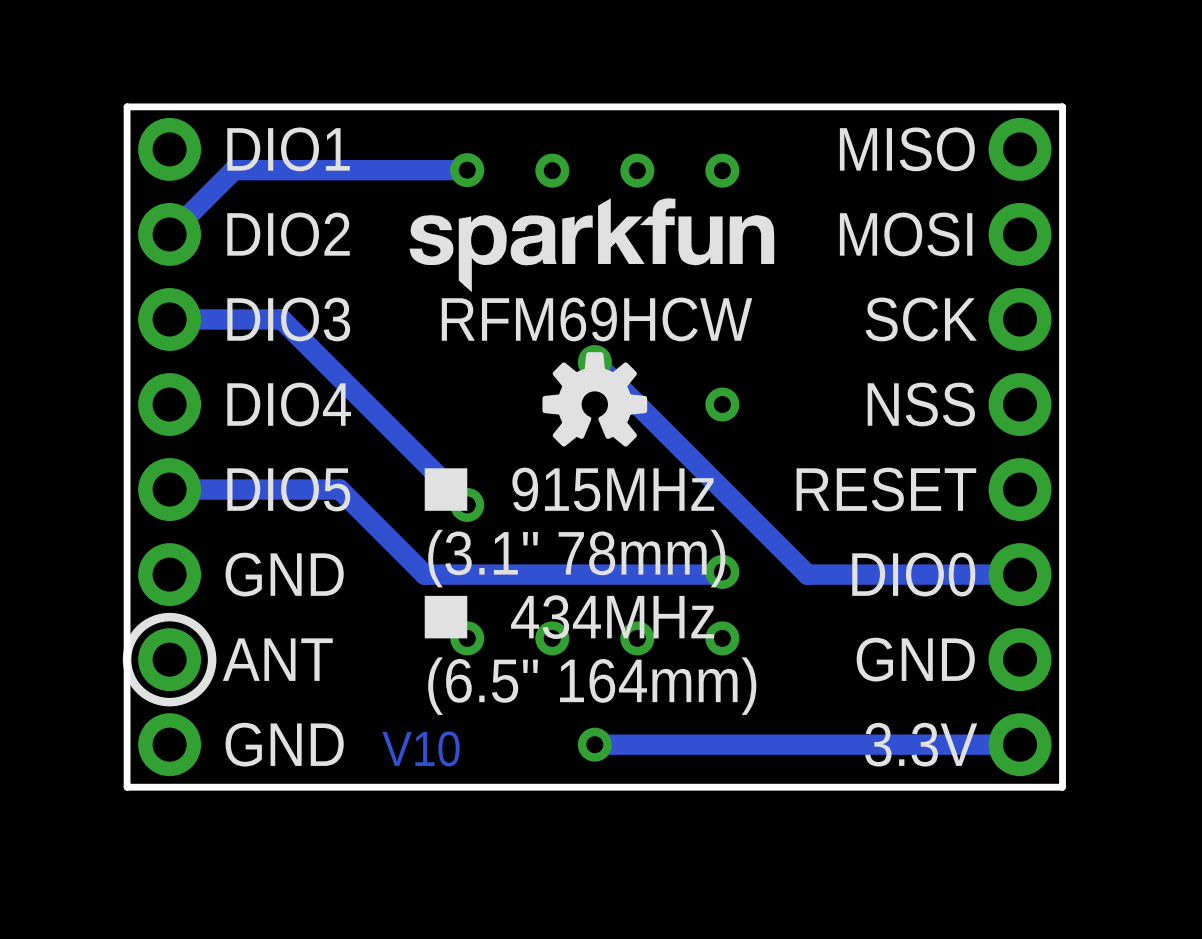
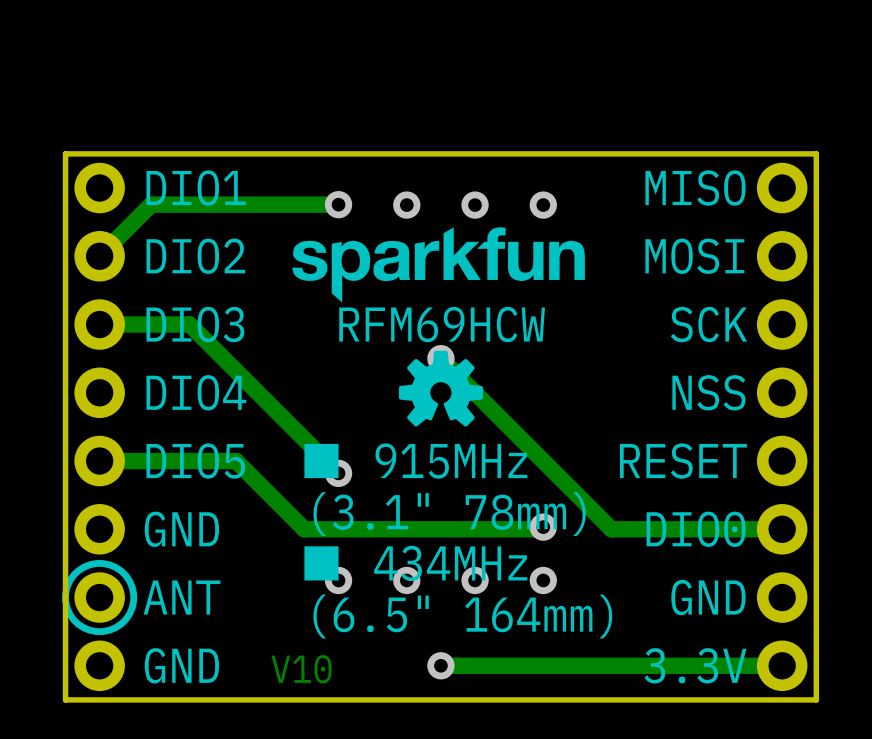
via: (722, 404) -> none

